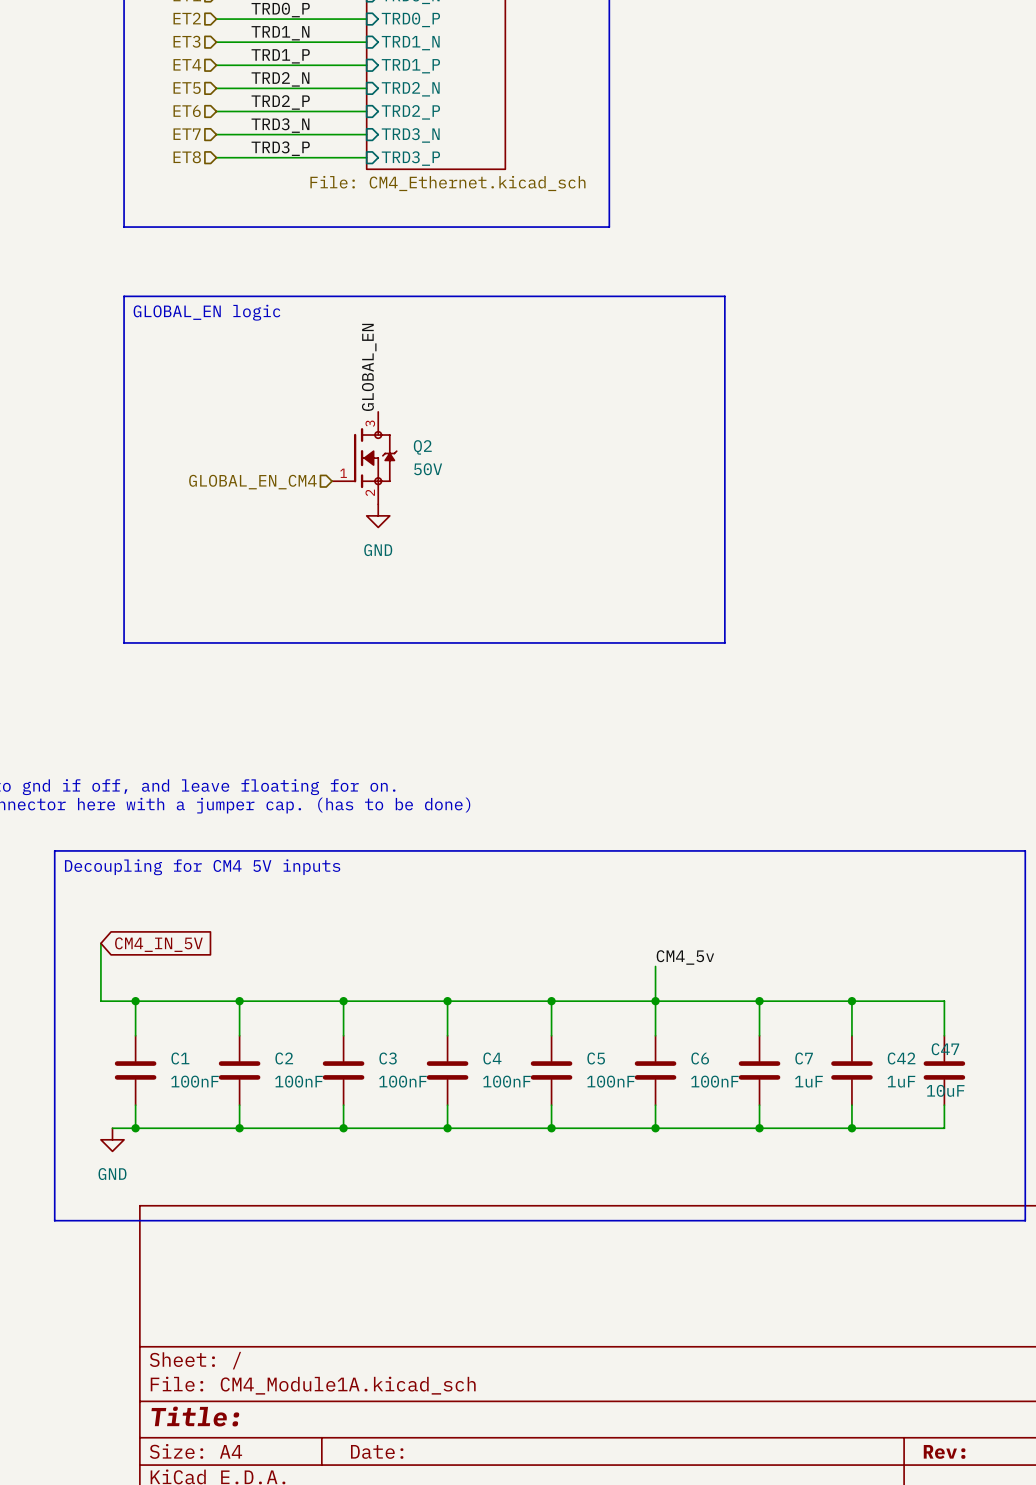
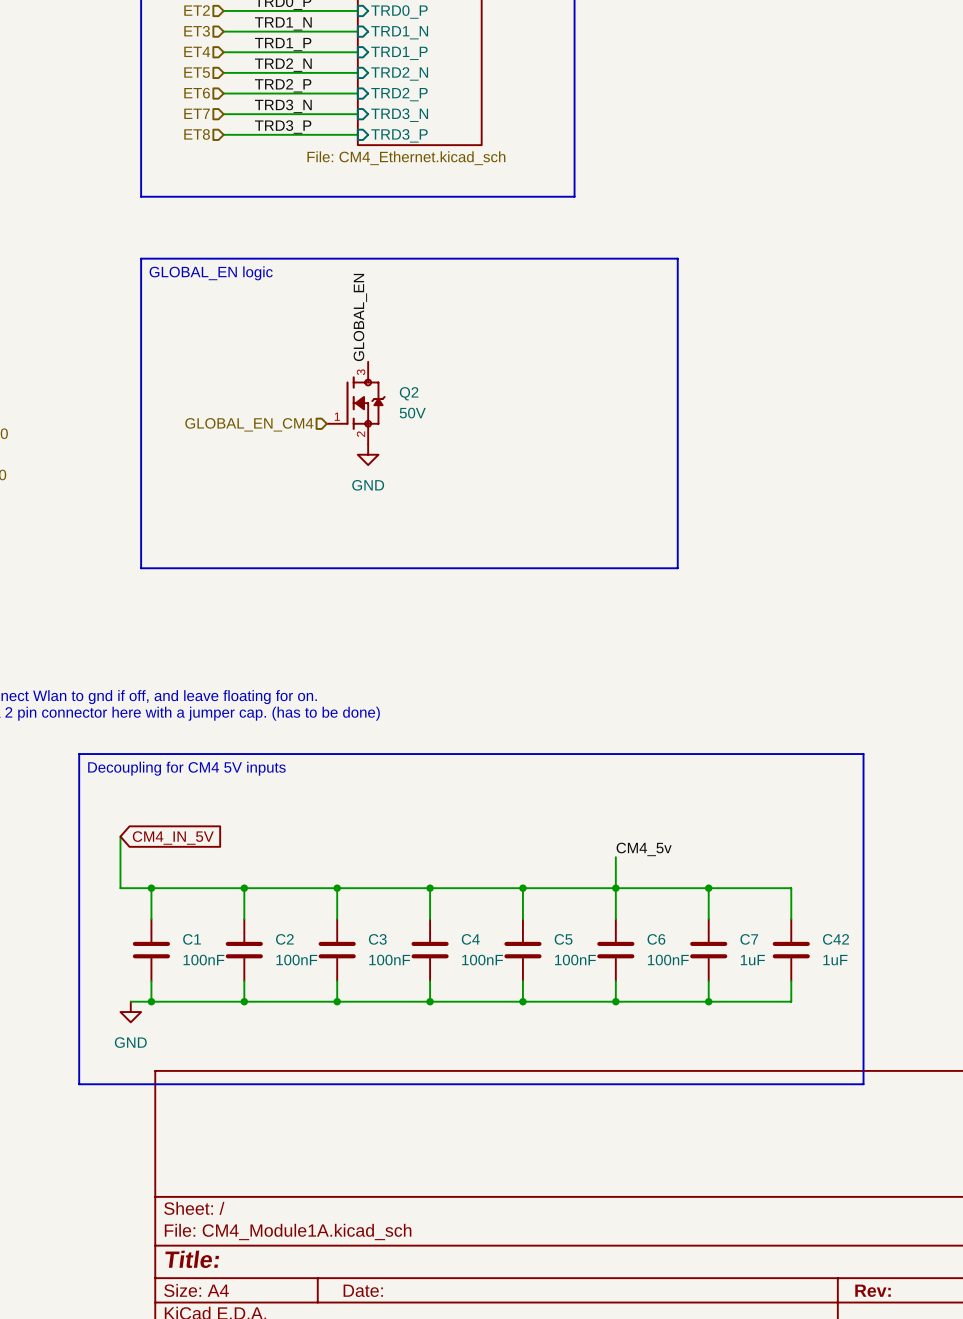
line: (932, 850) (1025, 850) (1025, 1220) (932, 1220) -> (863, 754) (863, 1084)
wire: (851, 1001) (944, 1001) (944, 1035) -> none
junction: (851, 1001) -> none
C47: 10uF (944, 1070) -> none
wire: (944, 1105) (944, 1128) (851, 1128) -> none
junction: (851, 1128) -> none

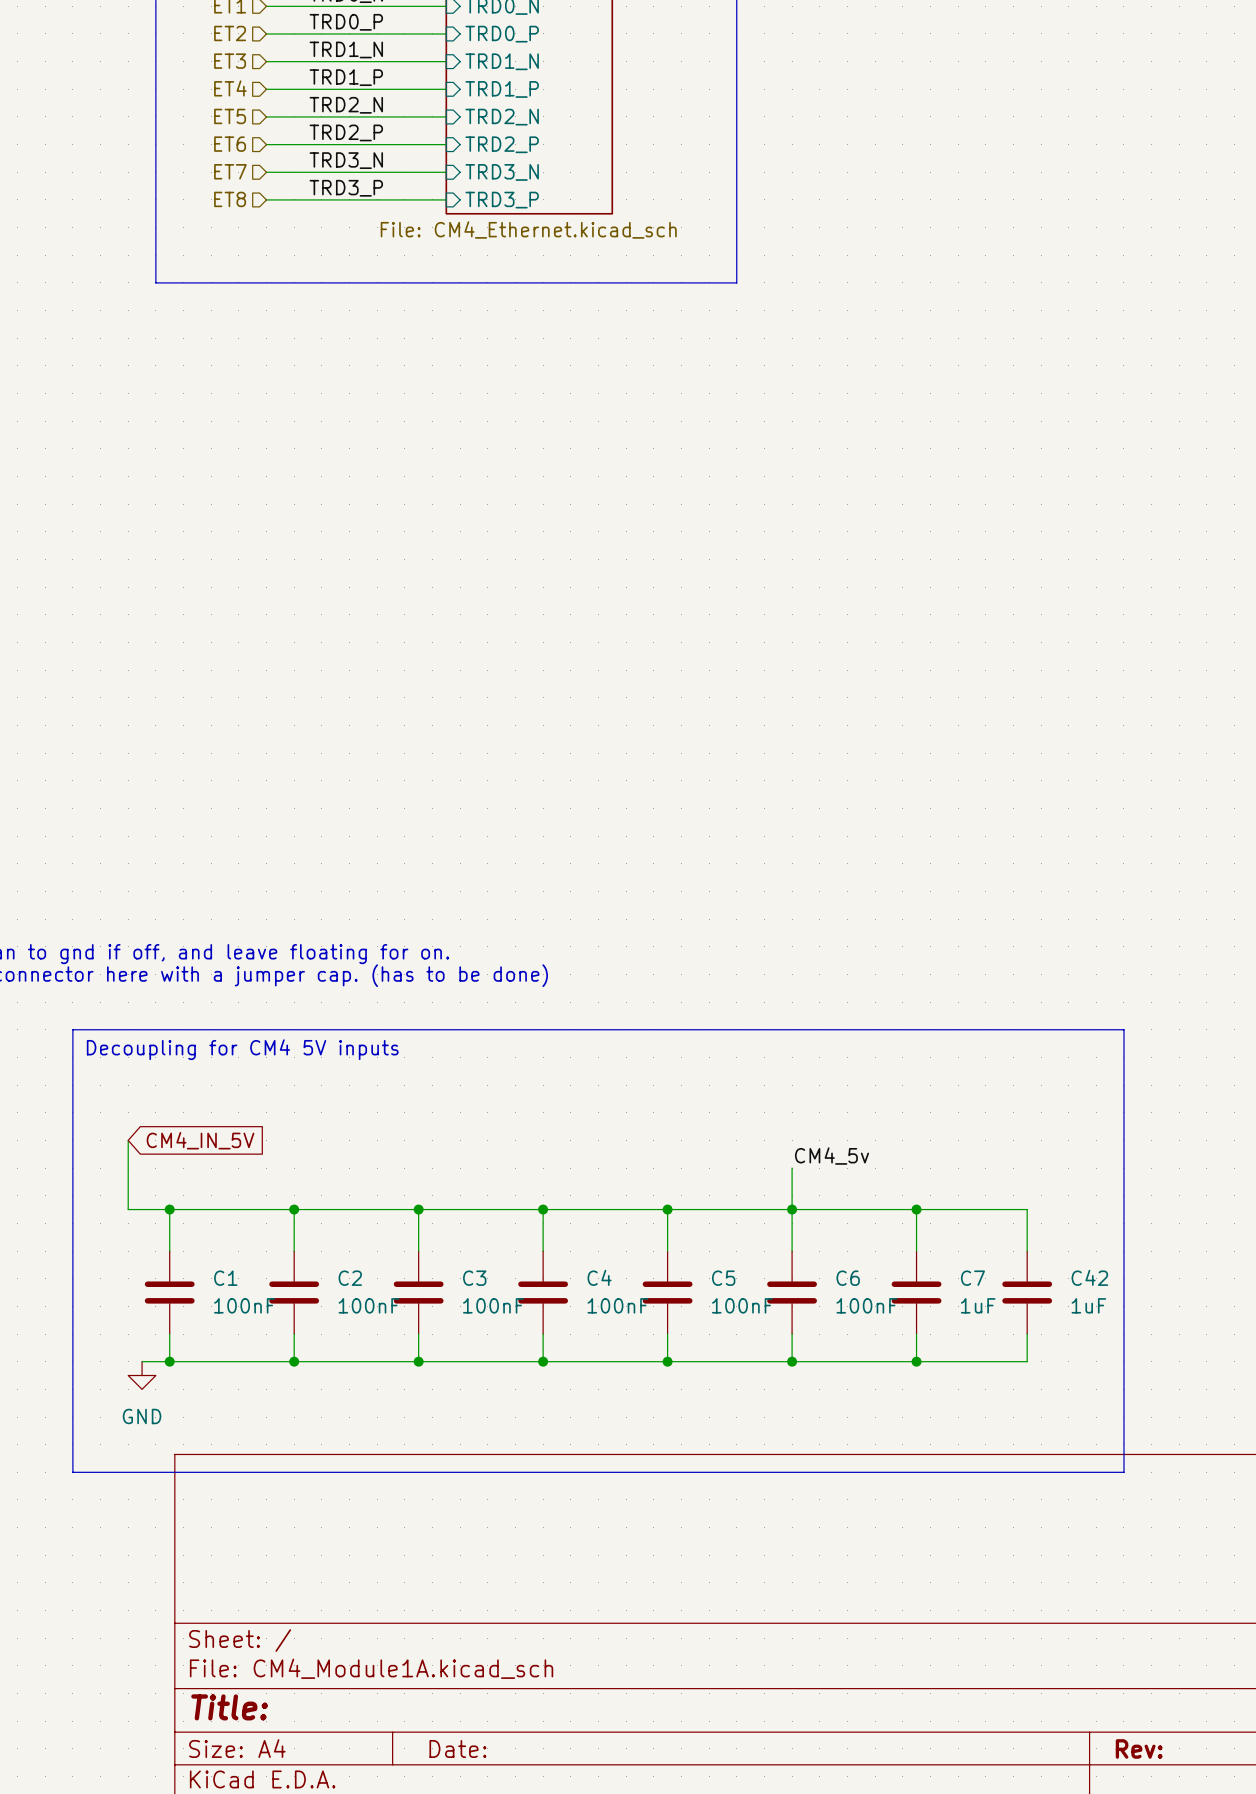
line: (141, 258) (677, 258) (677, 568) (141, 568) (141, 258) -> none
text: GLOBAL_EN logic (211, 273) -> none
label: GLOBAL_EN (360, 317) -> none
Q2: 50V (356, 403) -> none
hierarchical label: GLOBAL_EN_CM4 (249, 424) -> none
power symbol: GND (368, 454) -> none

